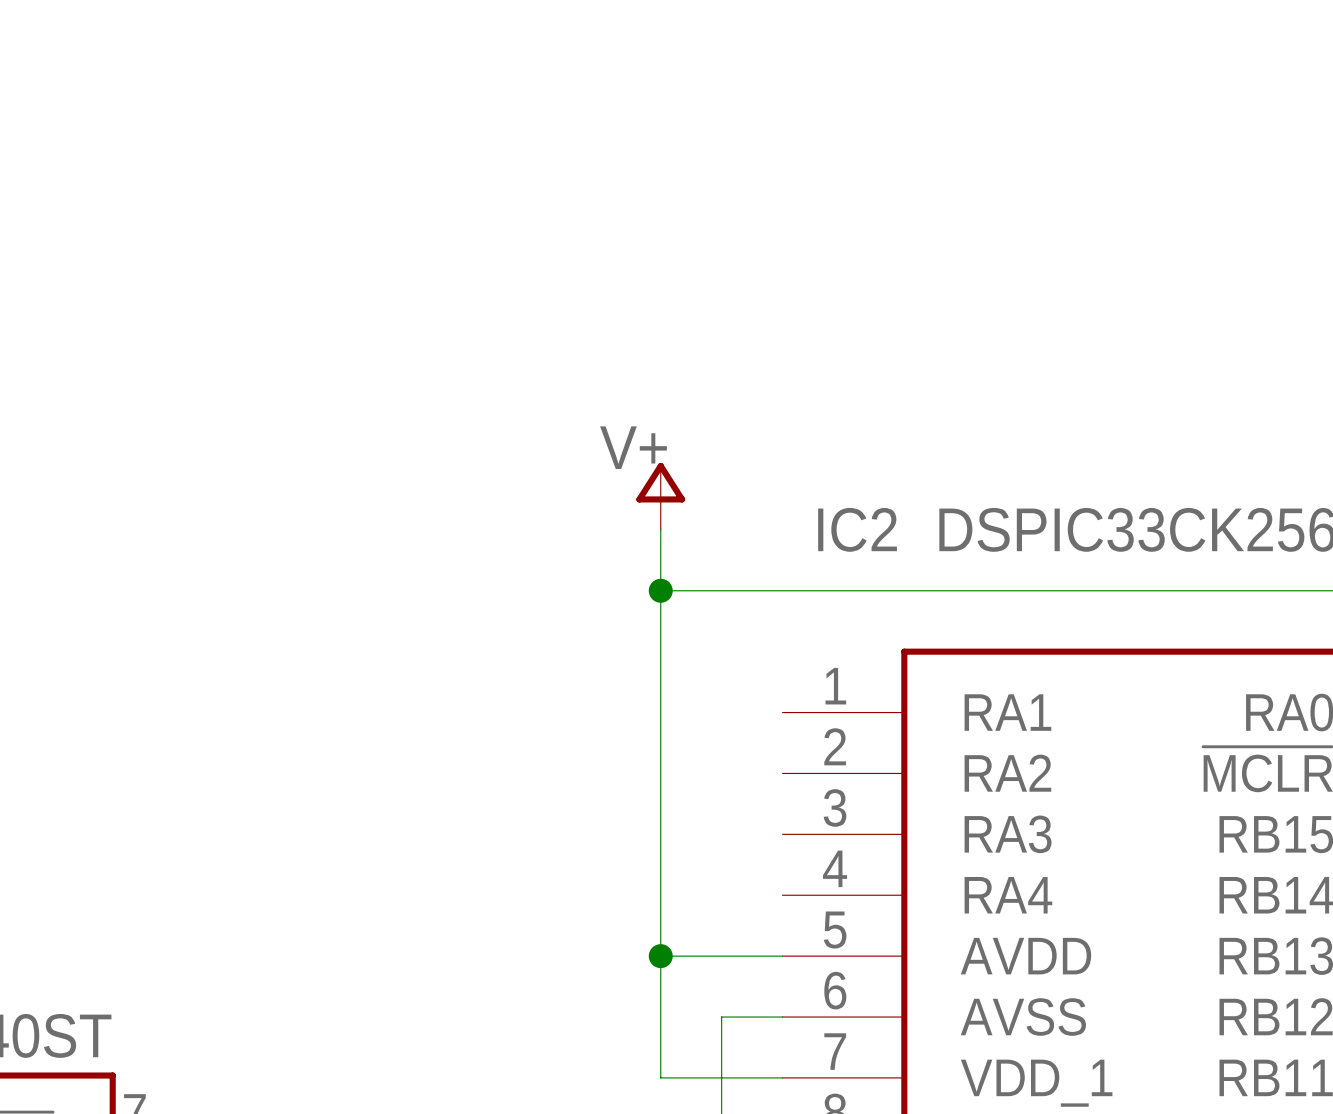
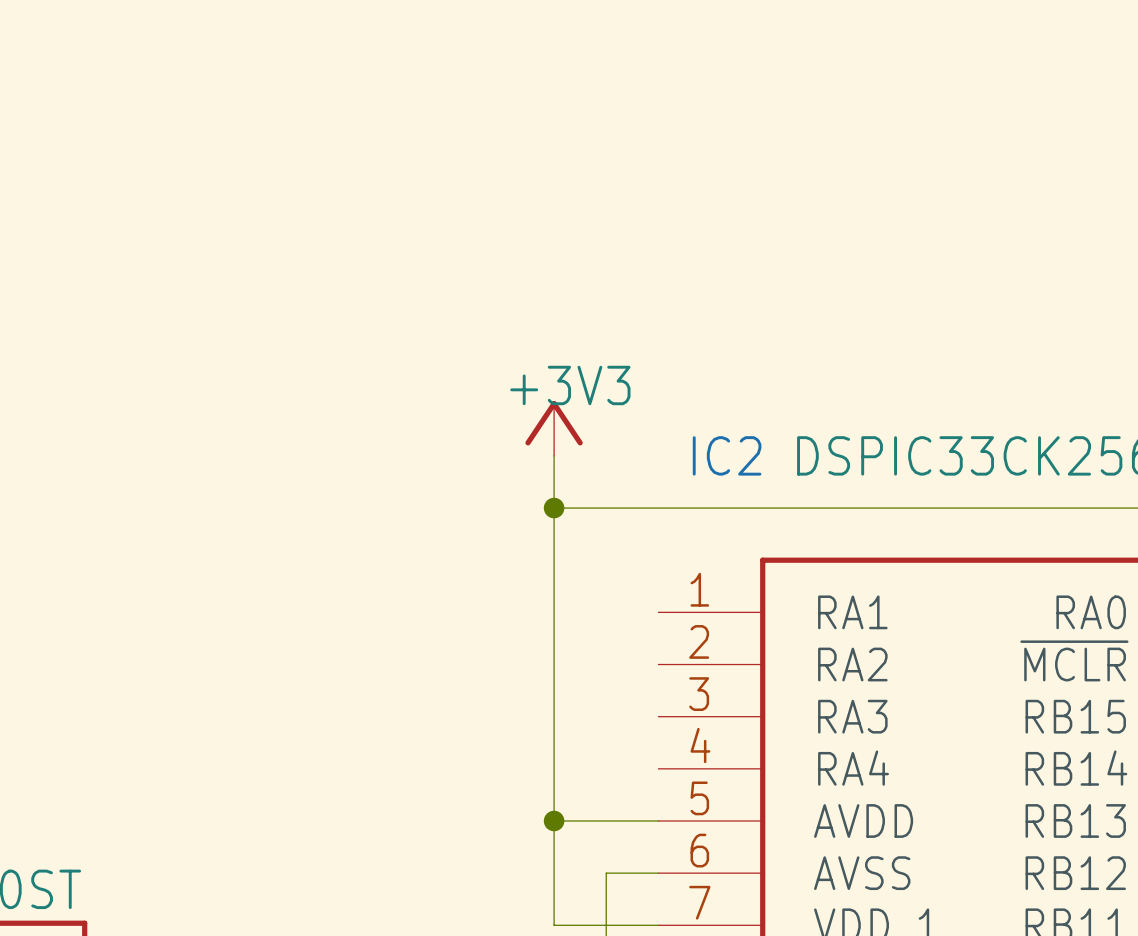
power symbol: V+ (660, 496) -> +3V3 (554, 428)

